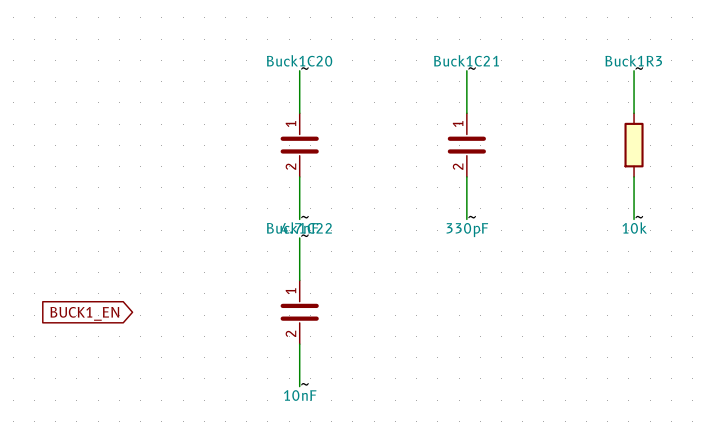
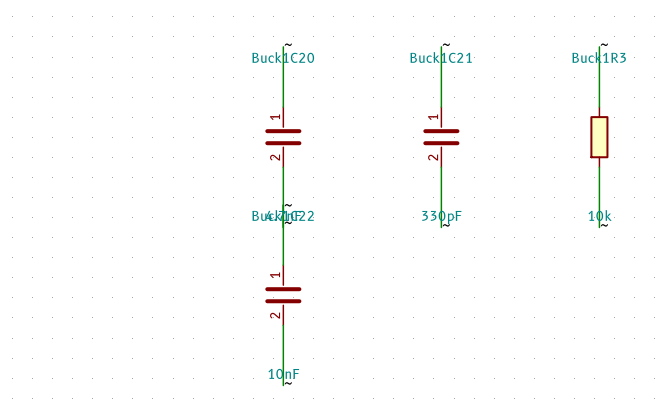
wire: none -> (283, 46) (283, 66)
wire: none -> (441, 46) (441, 66)
wire: none -> (599, 46) (599, 66)
label position: ~ (304, 68) -> ~ (288, 44)
label position: ~ (472, 68) -> ~ (446, 44)
label position: ~ (639, 68) -> ~ (604, 44)
label position: ~ (472, 217) -> ~ (446, 225)
label position: ~ (639, 217) -> ~ (604, 225)
wire: none -> (283, 207) (283, 224)
wire: none -> (441, 207) (441, 227)
wire: none -> (599, 207) (599, 227)
global label: BUCK1_EN (84, 313) -> none
label position: ~ (304, 384) -> ~ (288, 383)
wire: none -> (283, 365) (283, 385)

